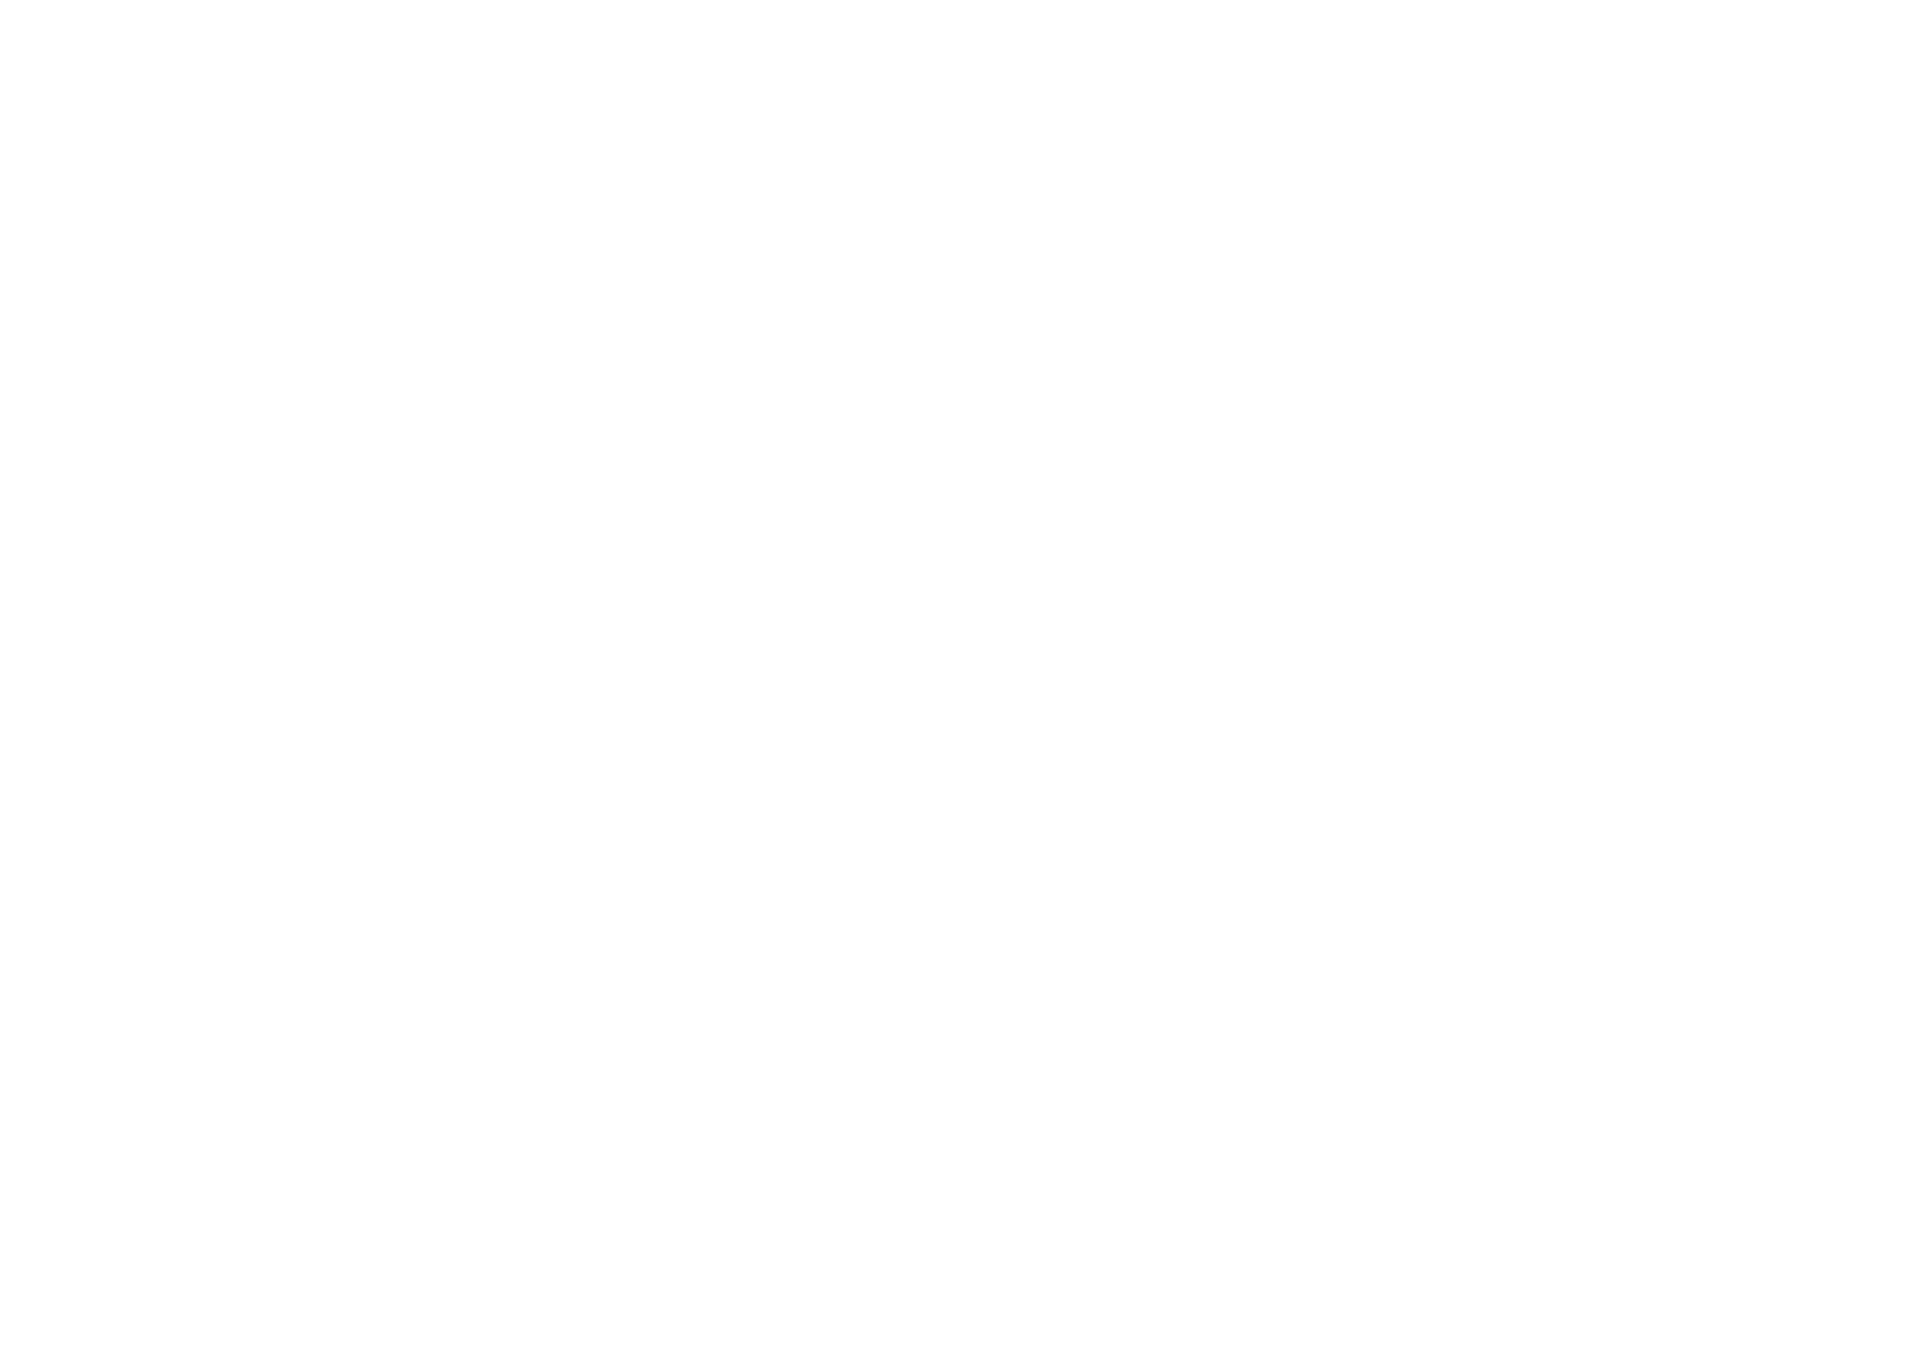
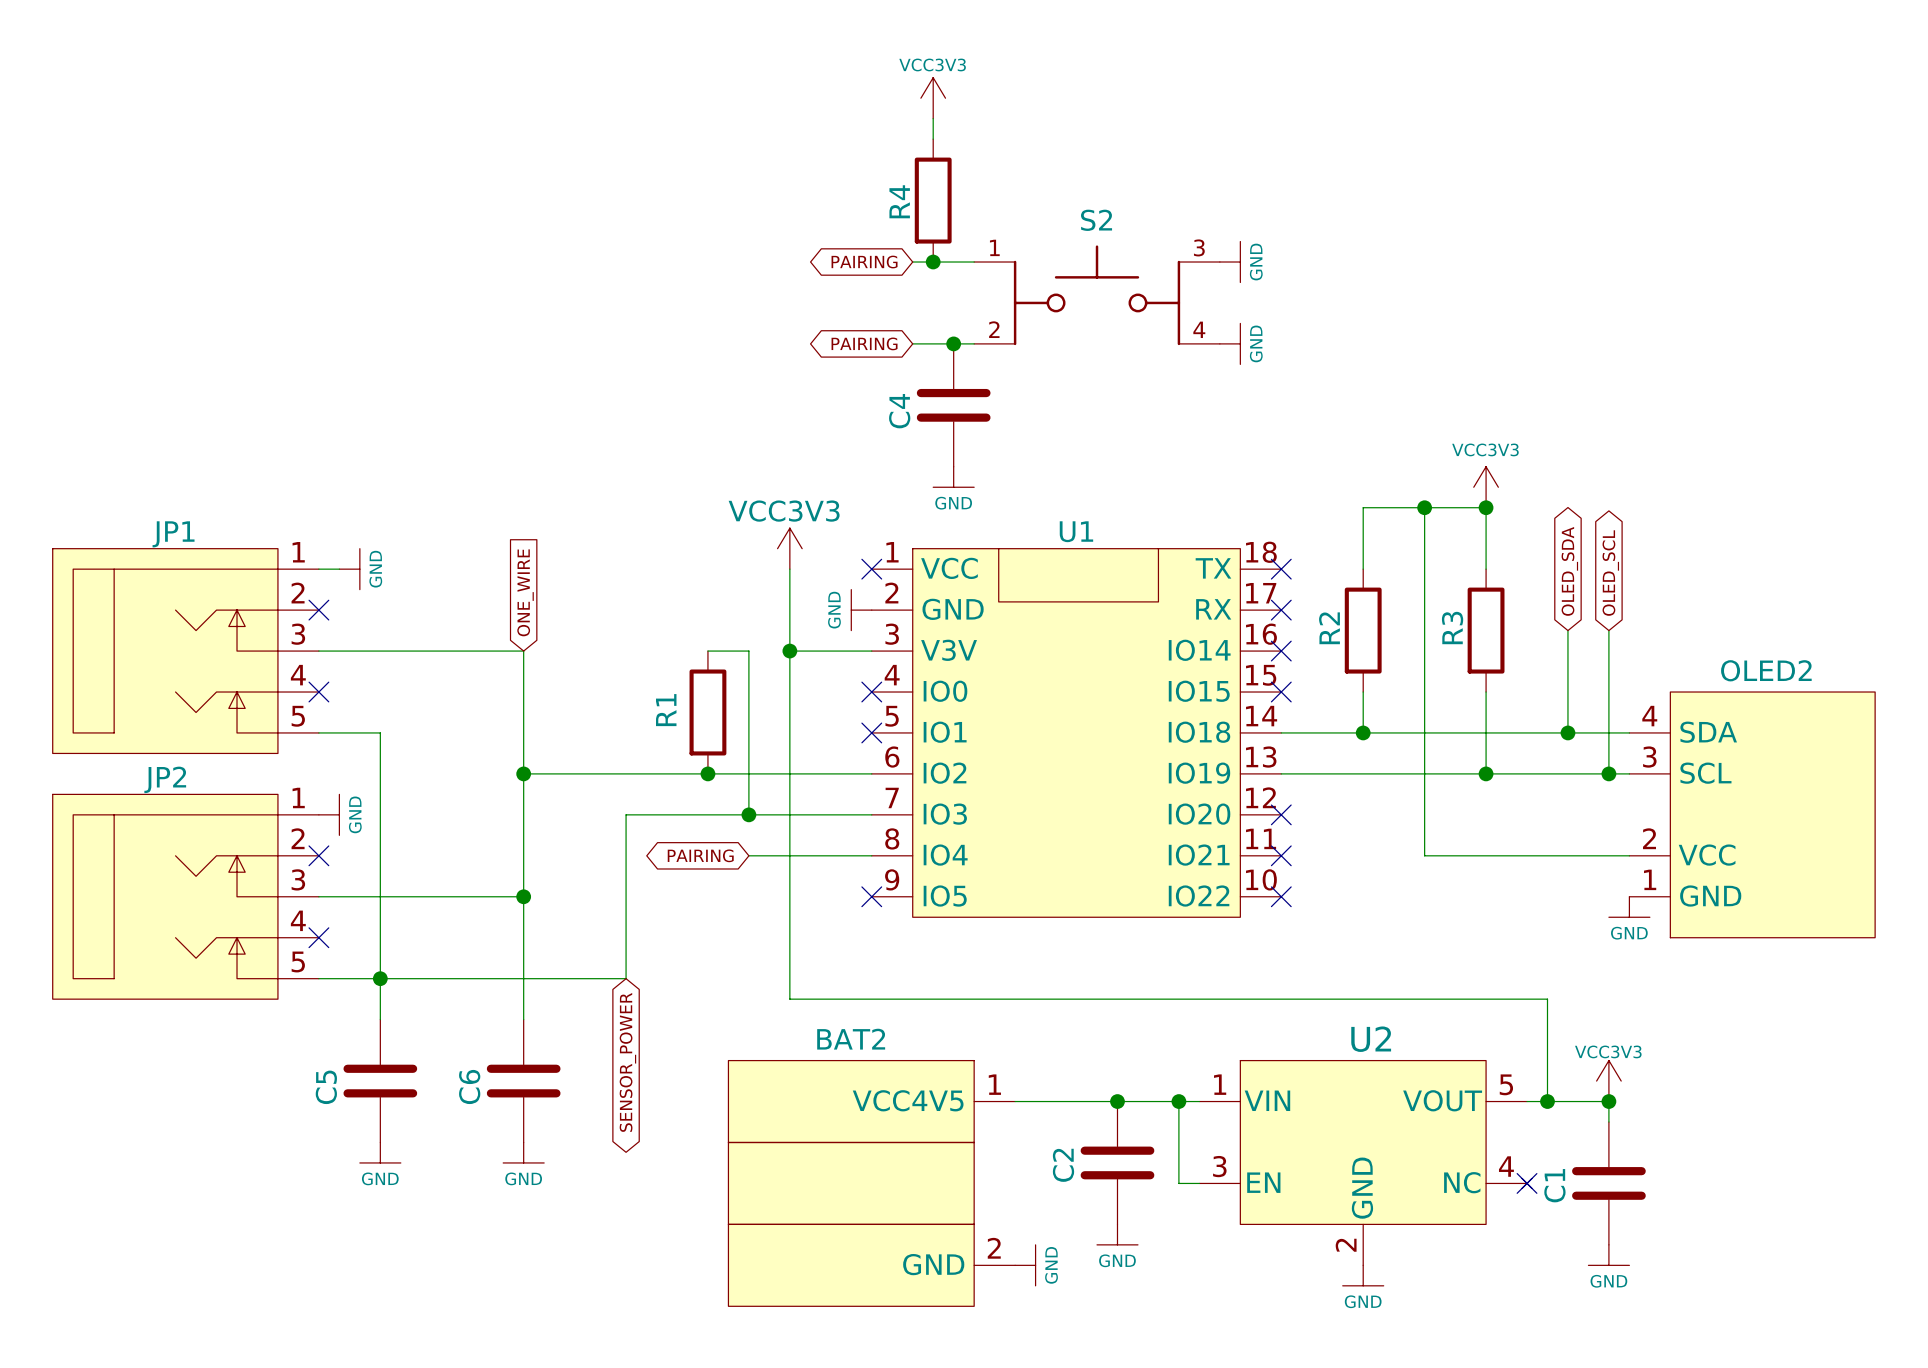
power symbol: none -> VCC3V3 (933, 98)
wire: none -> (933, 118) (933, 139)
R4: none -> (933, 200)
global label: none -> PAIRING (864, 262)
wire: none -> (912, 262) (974, 262)
junction: none -> (933, 262)
power symbol: none -> GND (1230, 262)
S2: none -> (1097, 295)
global label: none -> PAIRING (864, 343)
wire: none -> (912, 343) (974, 343)
junction: none -> (953, 343)
power symbol: none -> GND (1230, 343)
C4: none -> (953, 405)
power symbol: none -> GND (953, 477)
power symbol: none -> VCC3V3 (1486, 487)
wire: none -> (1424, 507) (1424, 855) (1629, 855)
junction: none -> (1424, 507)
junction: none -> (1486, 507)
power symbol: none -> VCC3V3 (789, 548)
wire: none -> (318, 569) (339, 569)
power symbol: none -> GND (349, 569)
wire: none -> (789, 569) (789, 999) (1547, 999) (1547, 1101)
no-connect mark: none -> (871, 569)
no-connect mark: none -> (1281, 569)
wire: none -> (1363, 569) (1363, 507) (1486, 507) (1486, 569)
global label: none -> OLED_SDA (1569, 571)
global label: none -> OLED_SCL (1610, 573)
global label: none -> ONE_WIRE (525, 592)
no-connect mark: none -> (318, 610)
power symbol: none -> GND (861, 610)
no-connect mark: none -> (1281, 610)
R2: none -> (1363, 630)
R3: none -> (1486, 630)
wire: none -> (1567, 630) (1567, 732)
wire: none -> (1608, 630) (1608, 773)
JP1: none -> (185, 651)
wire: none -> (318, 651) (523, 651) (523, 1019)
wire: none -> (707, 651) (748, 651) (748, 814)
wire: none -> (789, 651) (871, 651)
junction: none -> (789, 651)
no-connect mark: none -> (1281, 651)
no-connect mark: none -> (318, 692)
no-connect mark: none -> (871, 692)
no-connect mark: none -> (1281, 692)
wire: none -> (1363, 692) (1363, 732)
wire: none -> (1486, 692) (1486, 773)
R1: none -> (707, 712)
wire: none -> (318, 732) (380, 732) (380, 1019)
no-connect mark: none -> (871, 732)
U1: none -> (1076, 732)
wire: none -> (1281, 732) (1629, 732)
junction: none -> (1363, 732)
junction: none -> (1567, 732)
wire: none -> (523, 773) (871, 773)
junction: none -> (523, 773)
junction: none -> (707, 773)
wire: none -> (1281, 773) (1629, 773)
junction: none -> (1486, 773)
junction: none -> (1608, 773)
power symbol: none -> GND (329, 814)
junction: none -> (748, 814)
wire: none -> (871, 814) (626, 814) (626, 978) (318, 978)
no-connect mark: none -> (1281, 814)
OLED2: none -> (1752, 814)
no-connect mark: none -> (318, 855)
global label: none -> PAIRING (700, 855)
wire: none -> (748, 855) (871, 855)
no-connect mark: none -> (1281, 855)
JP2: none -> (185, 896)
wire: none -> (318, 896) (523, 896)
junction: none -> (523, 896)
no-connect mark: none -> (871, 896)
no-connect mark: none -> (1281, 896)
power symbol: none -> GND (1629, 907)
no-connect mark: none -> (318, 937)
junction: none -> (380, 978)
global label: none -> SENSOR_POWER (627, 1062)
C5: none -> (380, 1081)
C6: none -> (523, 1081)
power symbol: none -> VCC3V3 (1608, 1081)
wire: none -> (1015, 1101) (1199, 1101)
junction: none -> (1117, 1101)
wire: none -> (1178, 1101) (1178, 1183) (1199, 1183)
junction: none -> (1178, 1101)
wire: none -> (1527, 1101) (1608, 1101) (1608, 1122)
junction: none -> (1547, 1101)
junction: none -> (1608, 1101)
power symbol: none -> GND (380, 1152)
power symbol: none -> GND (523, 1152)
C2: none -> (1117, 1162)
U2: none -> (1365, 1162)
BAT2: none -> (871, 1183)
no-connect mark: none -> (1527, 1183)
C1: none -> (1608, 1183)
power symbol: none -> GND (1117, 1234)
power symbol: none -> GND (1608, 1255)
power symbol: none -> GND (1025, 1265)
power symbol: none -> GND (1363, 1275)

